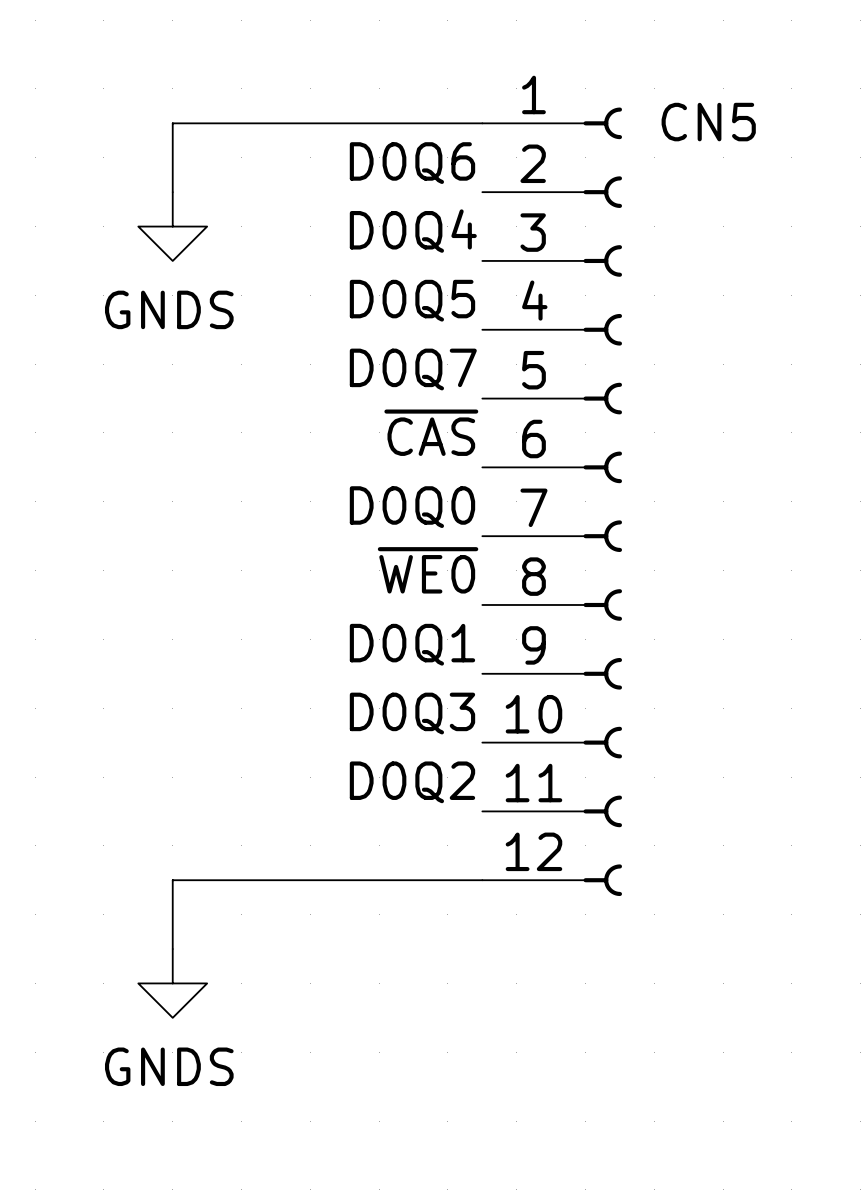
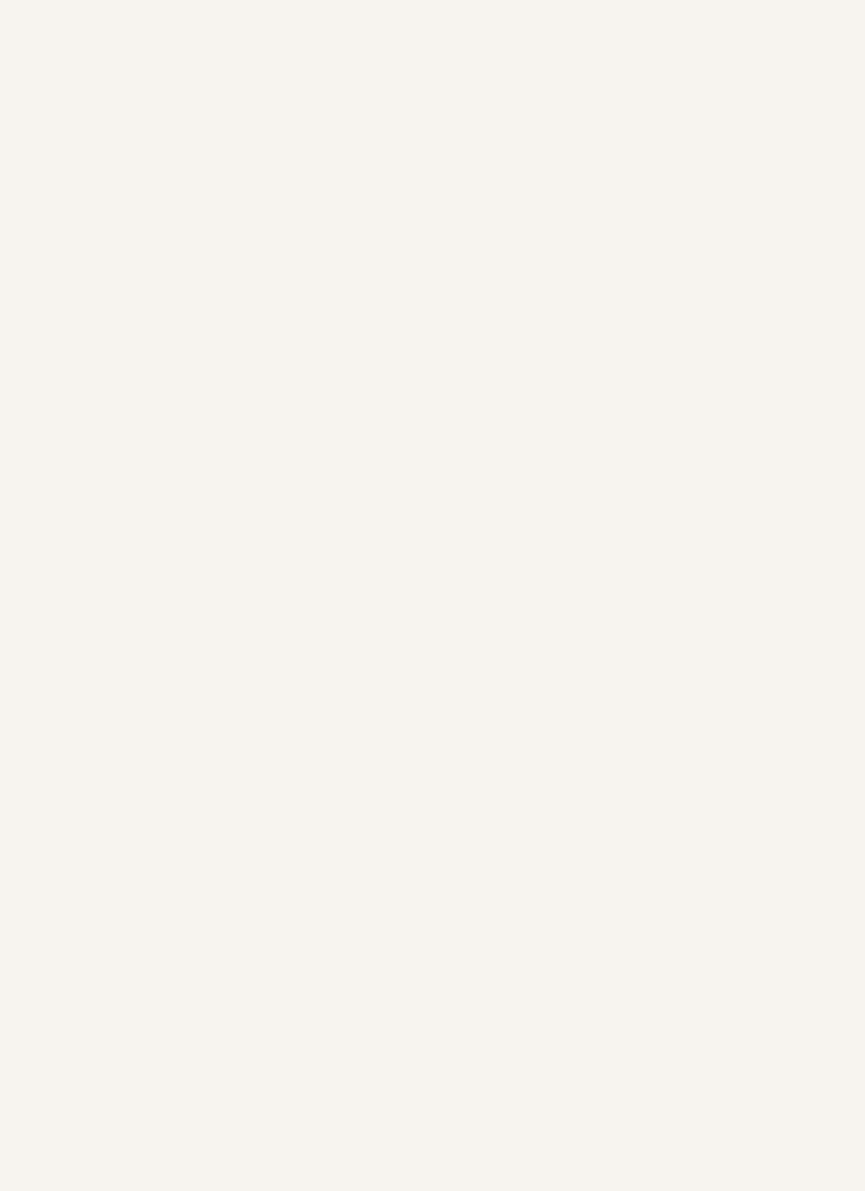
wire: (482, 123) (172, 123) (172, 192) -> none
label: D0Q6 (412, 163) -> none
power symbol: GNDS (172, 226) -> none
label: D0Q4 (413, 231) -> none
label: D0Q5 (412, 300) -> none
label: D0Q7 (413, 369) -> none
label: ~{CAS} (431, 432) -> none
CN5: (552, 501) -> none
label: D0Q0 (412, 507) -> none
label: ~{WE0} (428, 570) -> none
label: D0Q1 (412, 644) -> none
label: D0Q3 (412, 713) -> none
label: D0Q2 (412, 782) -> none
wire: (482, 880) (172, 880) (172, 949) -> none
power symbol: GNDS (172, 983) -> none

